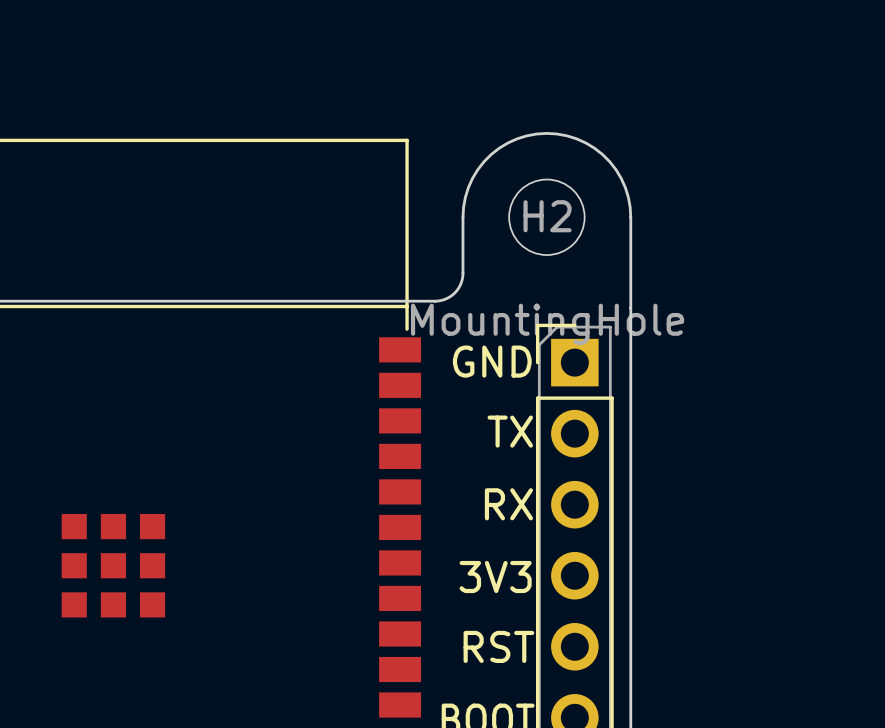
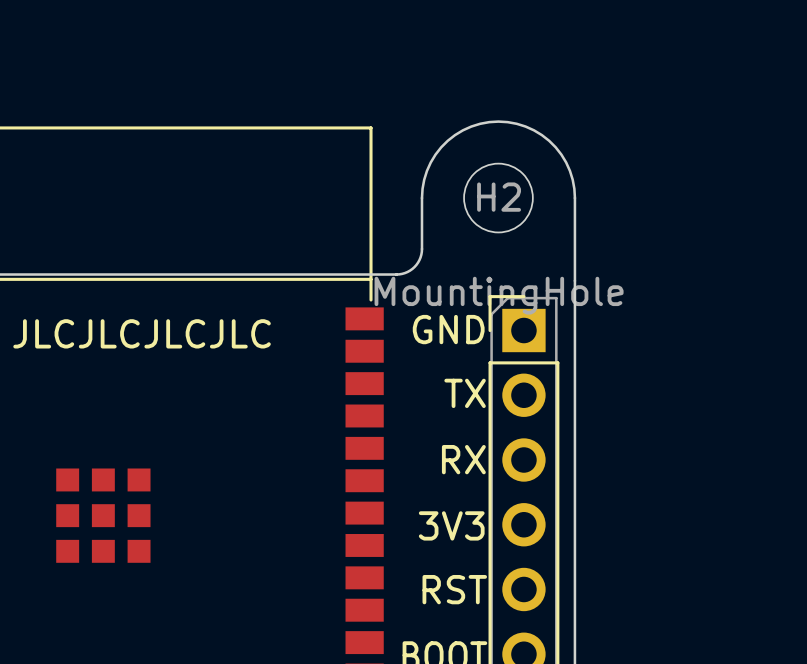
text: none -> JLCJLCJLCJLC (142, 333)

